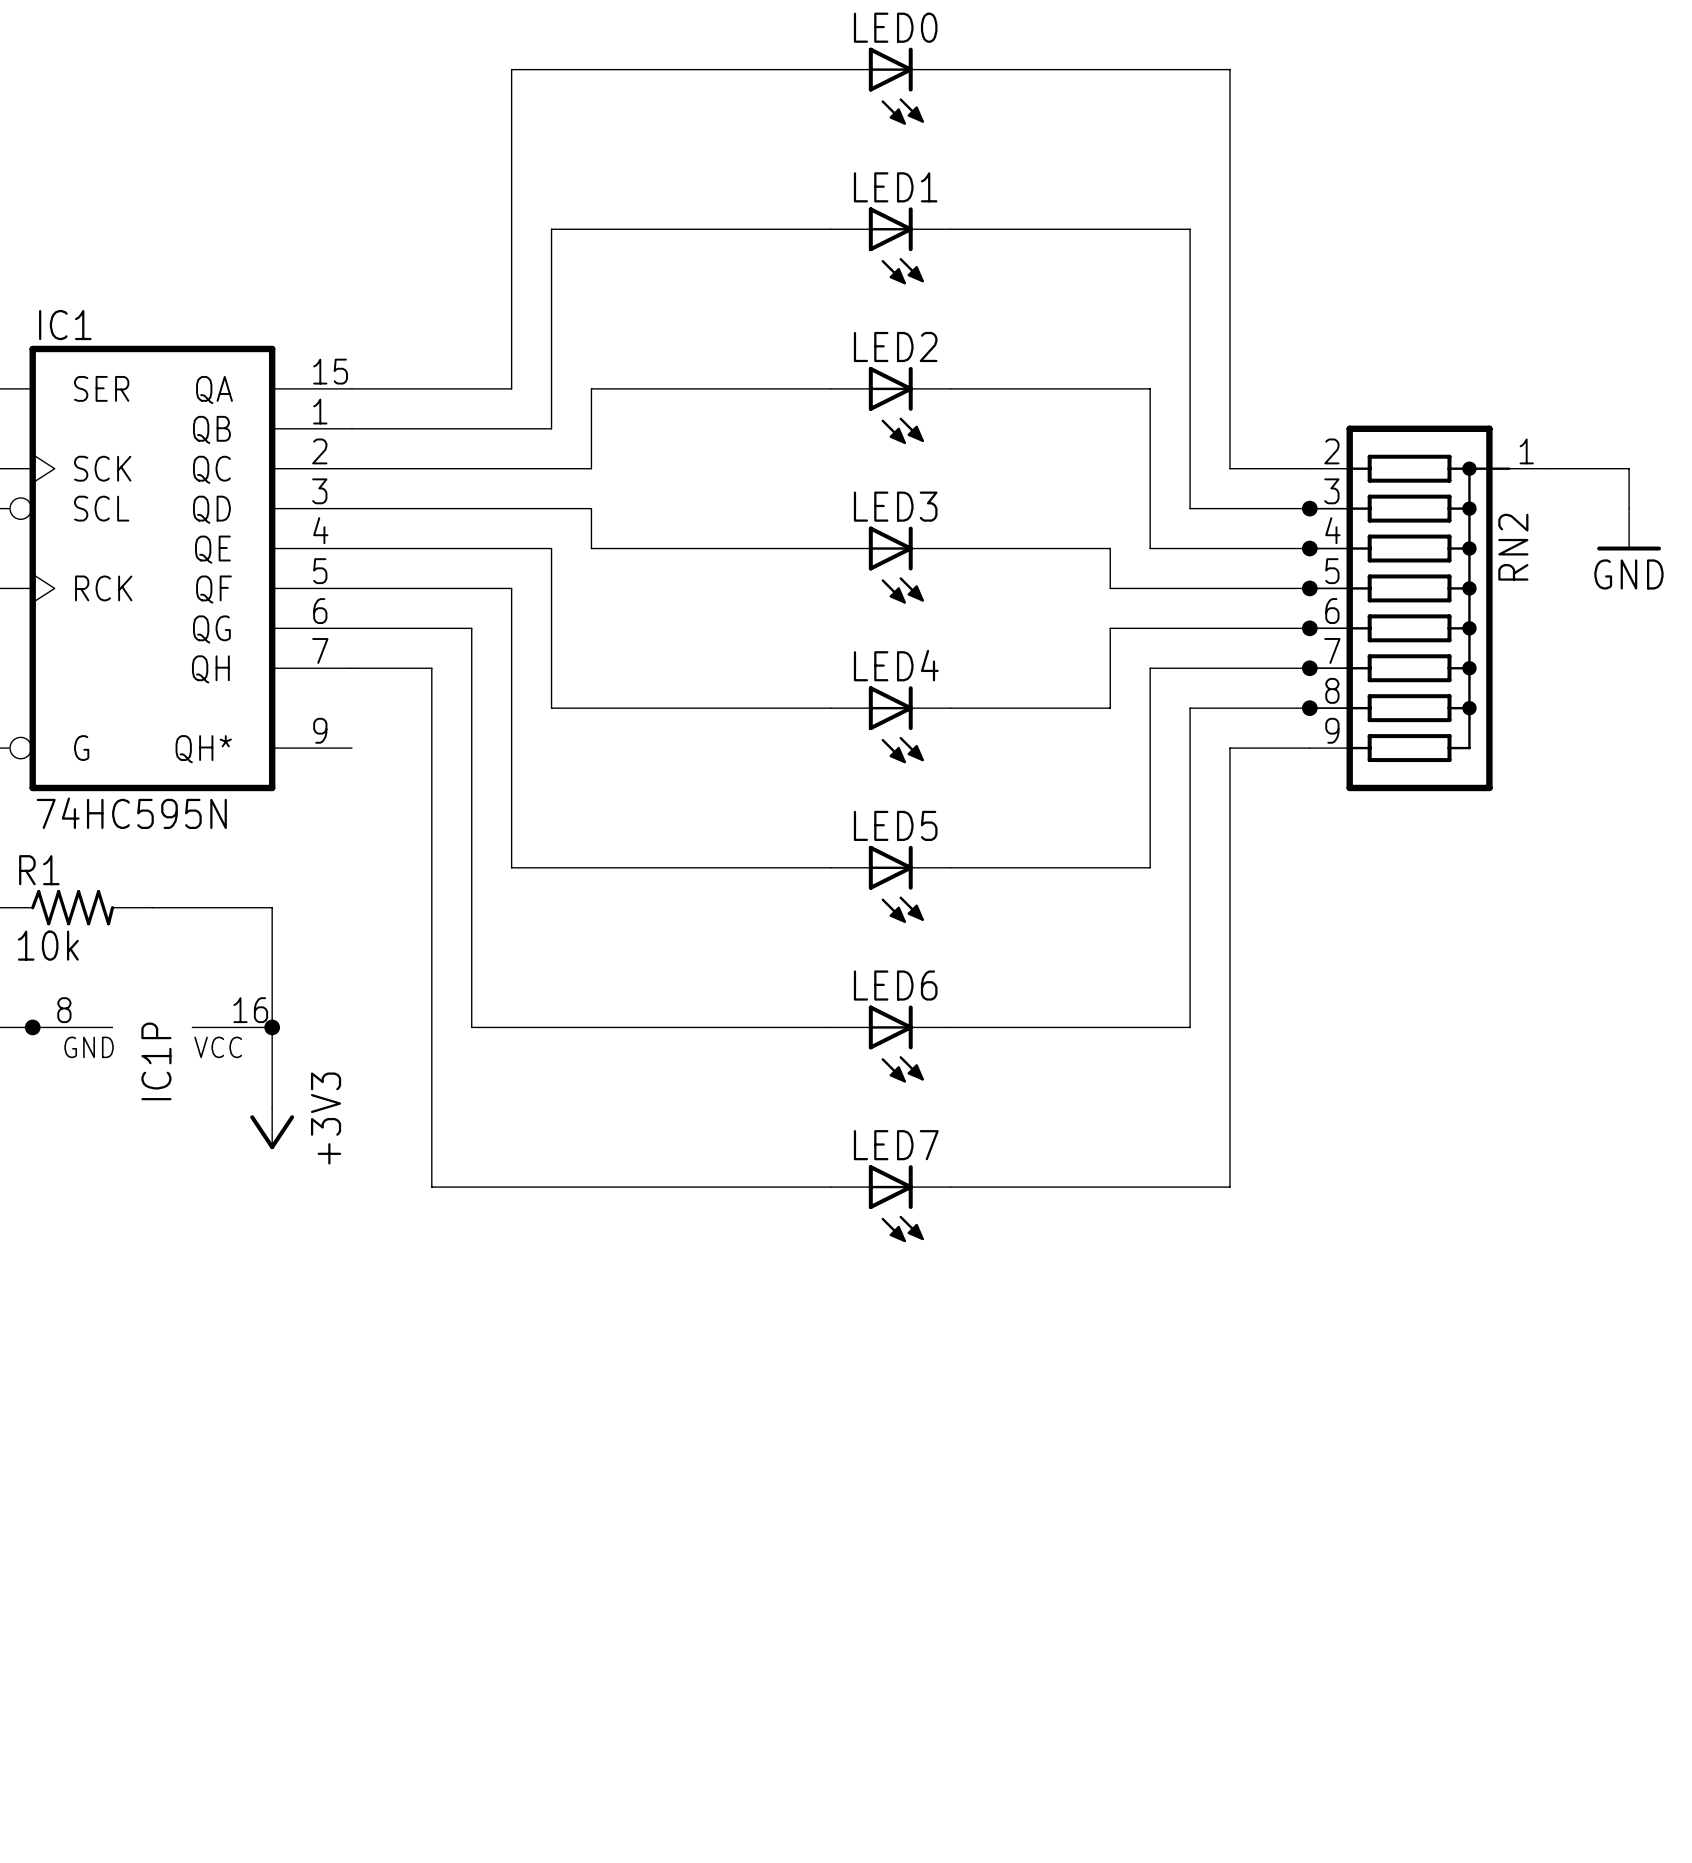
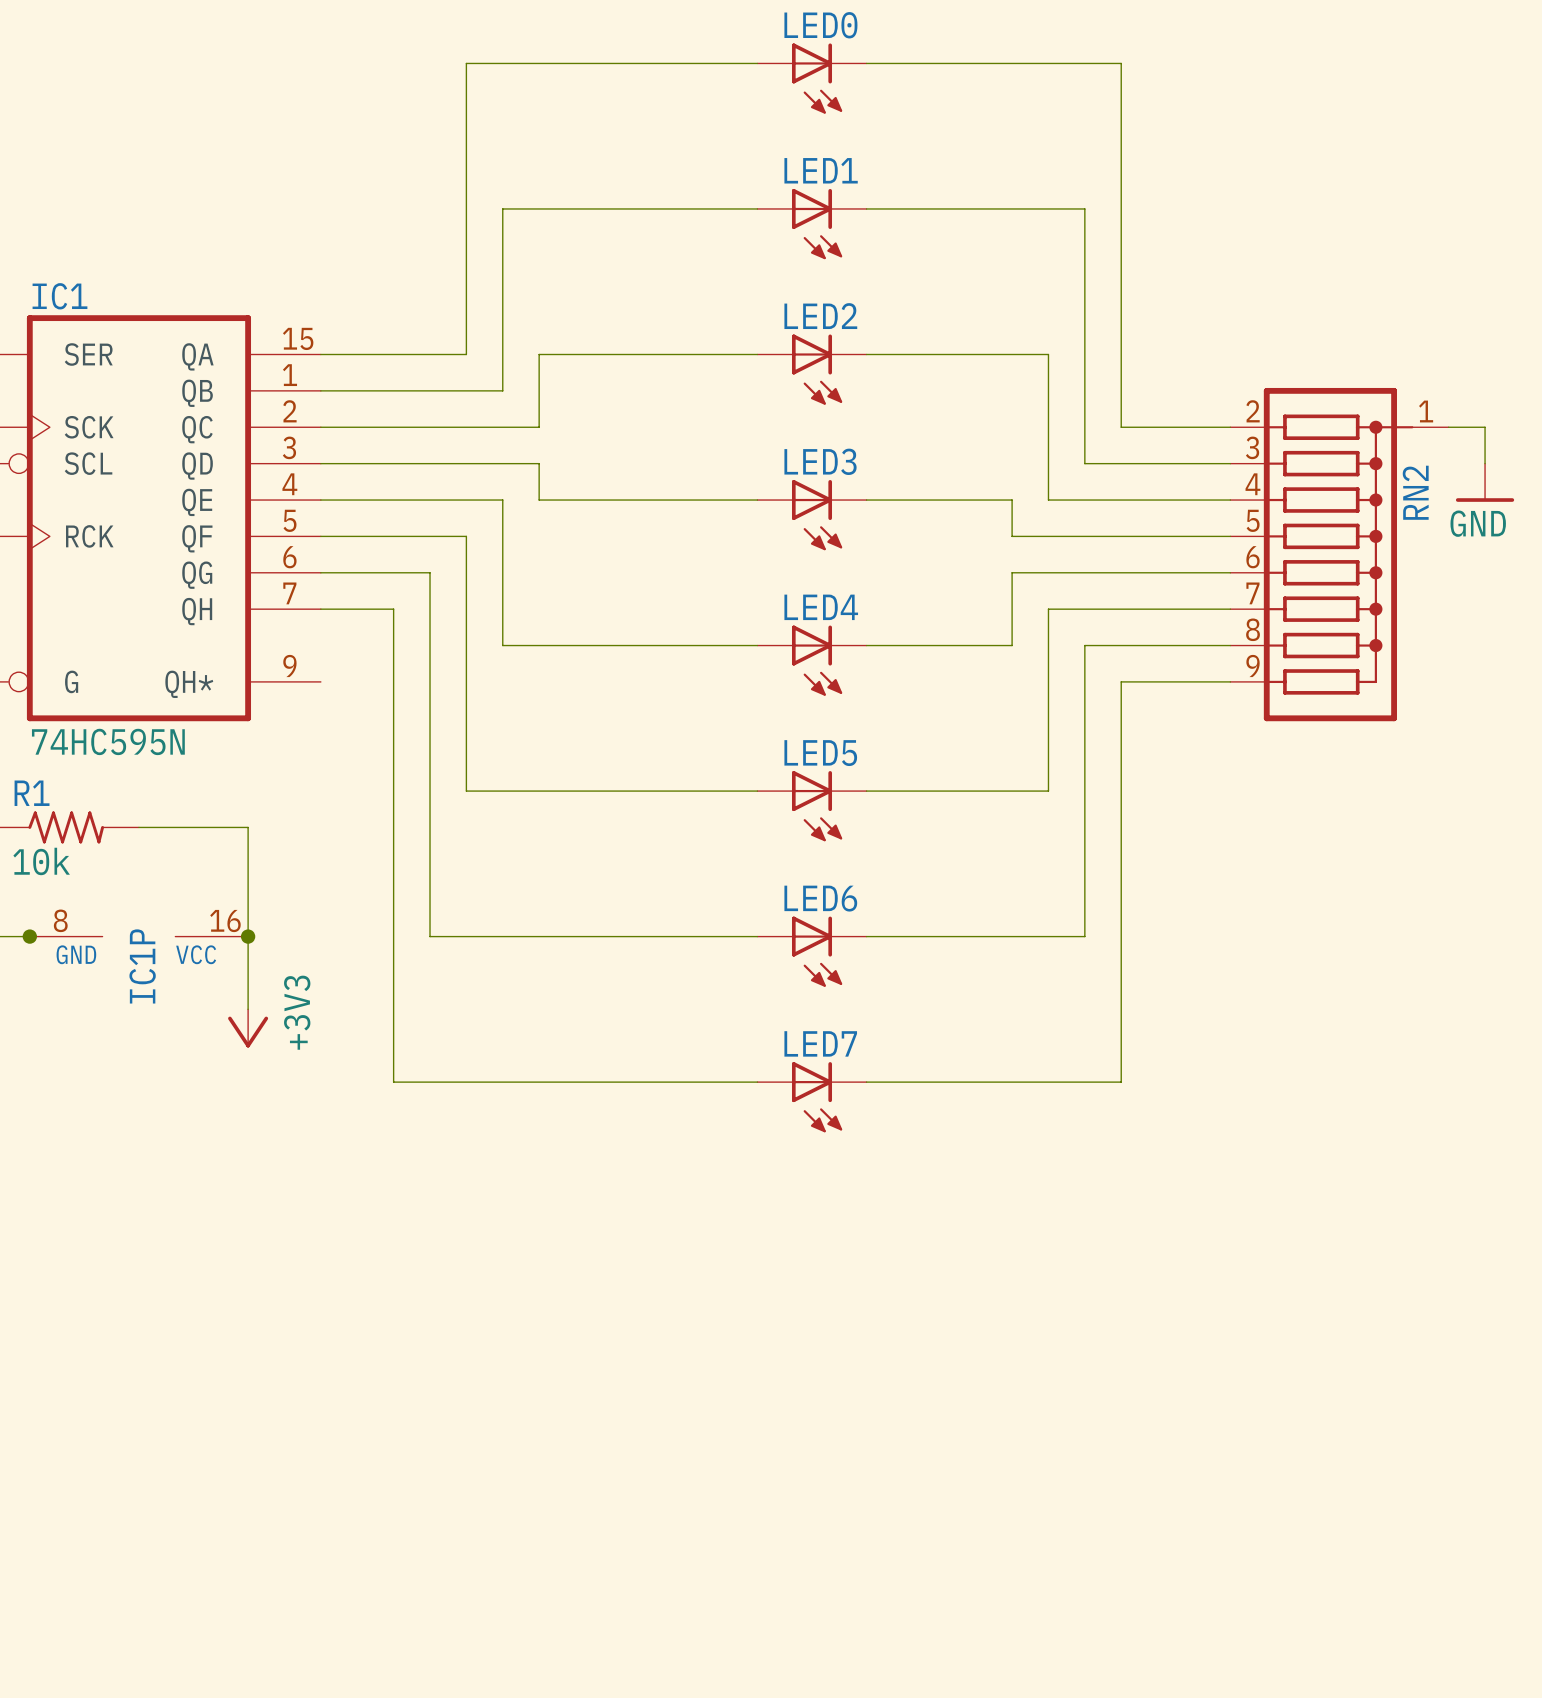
junction: (1309, 508) -> none
junction: (1309, 548) -> none
junction: (1309, 588) -> none
RN2 position: (1429, 608) -> (1339, 554)
junction: (1309, 628) -> none
junction: (1309, 668) -> none
junction: (1309, 708) -> none

